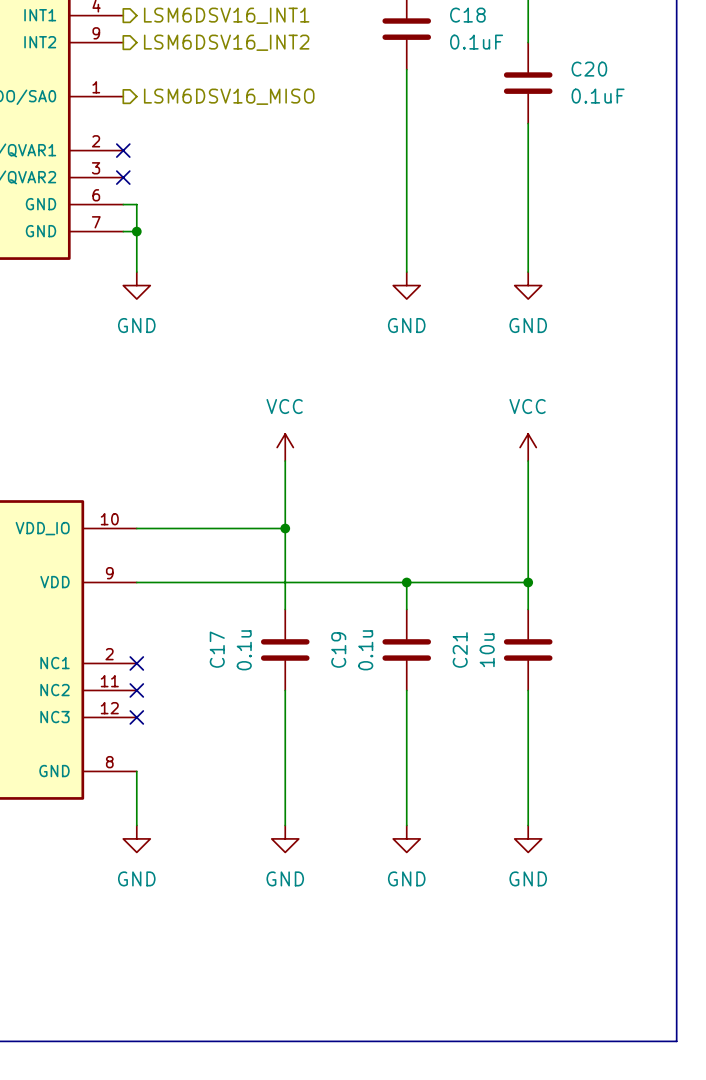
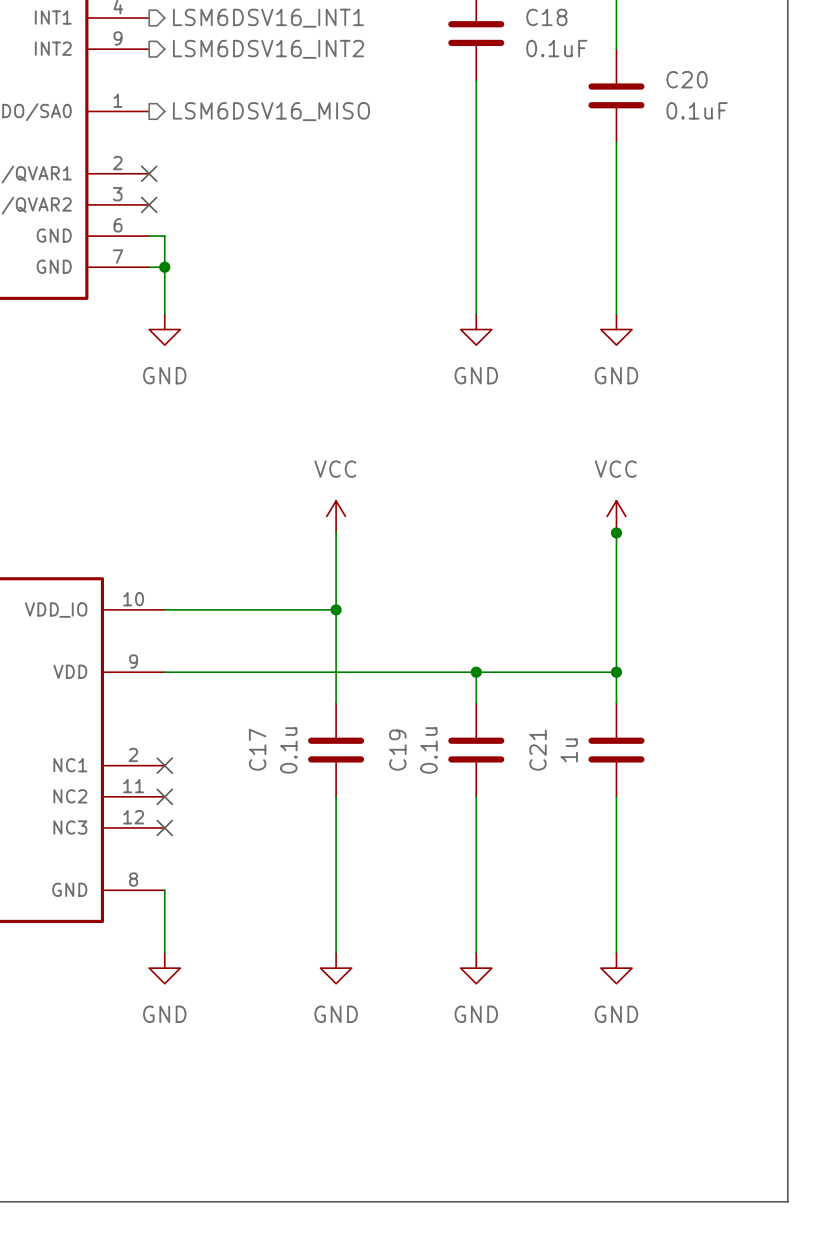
junction: none -> (616, 532)
C21 value: 10u (487, 650) -> 1u (569, 750)

